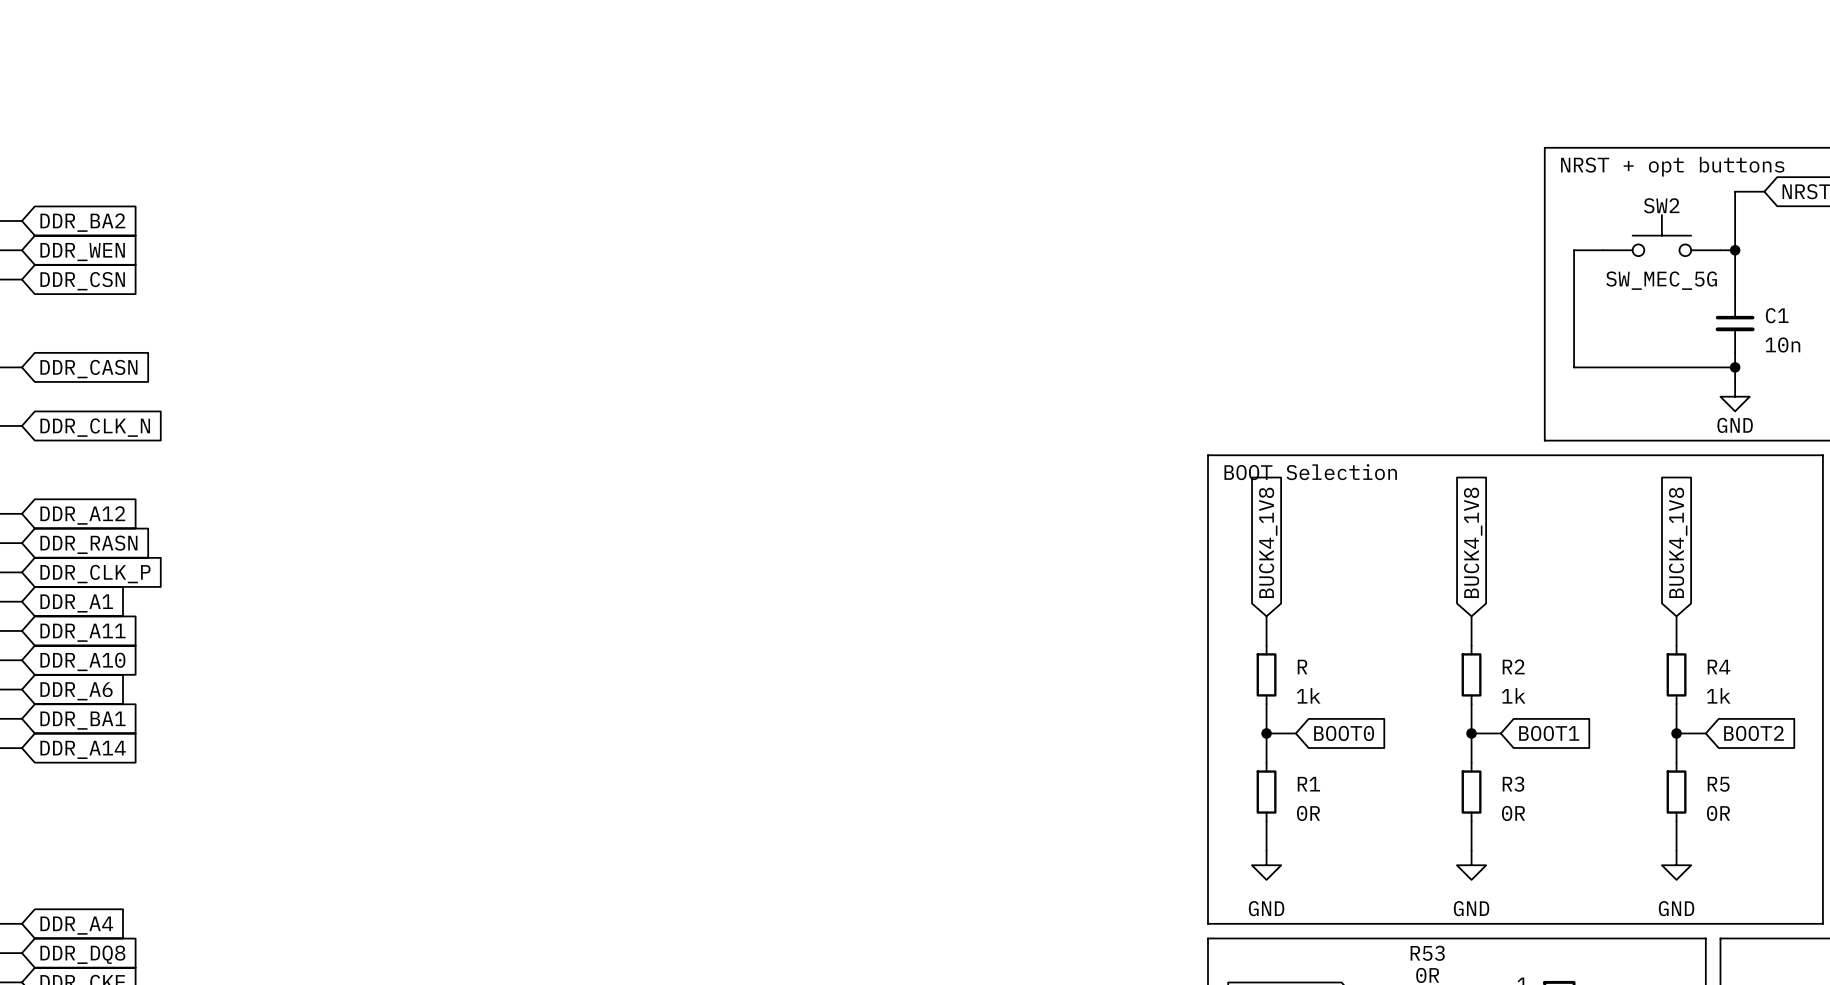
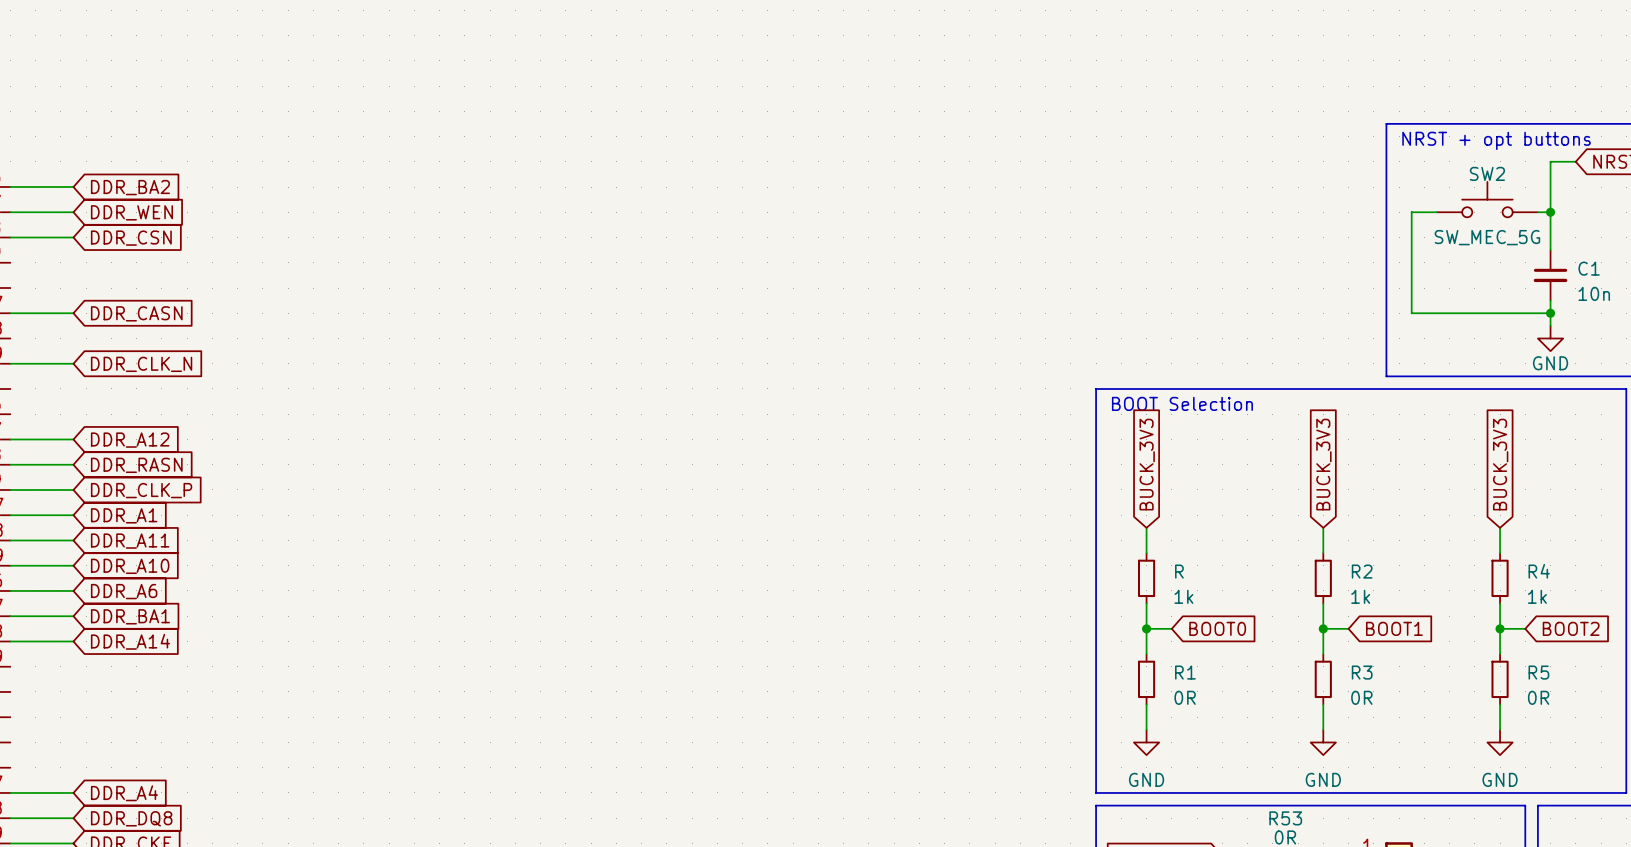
global label: BUCK4_1V8 (1268, 542) -> BUCK_3V3 (1147, 464)
global label: BUCK4_1V8 (1473, 542) -> BUCK_3V3 (1323, 464)
global label: BUCK4_1V8 (1678, 542) -> BUCK_3V3 (1500, 464)

